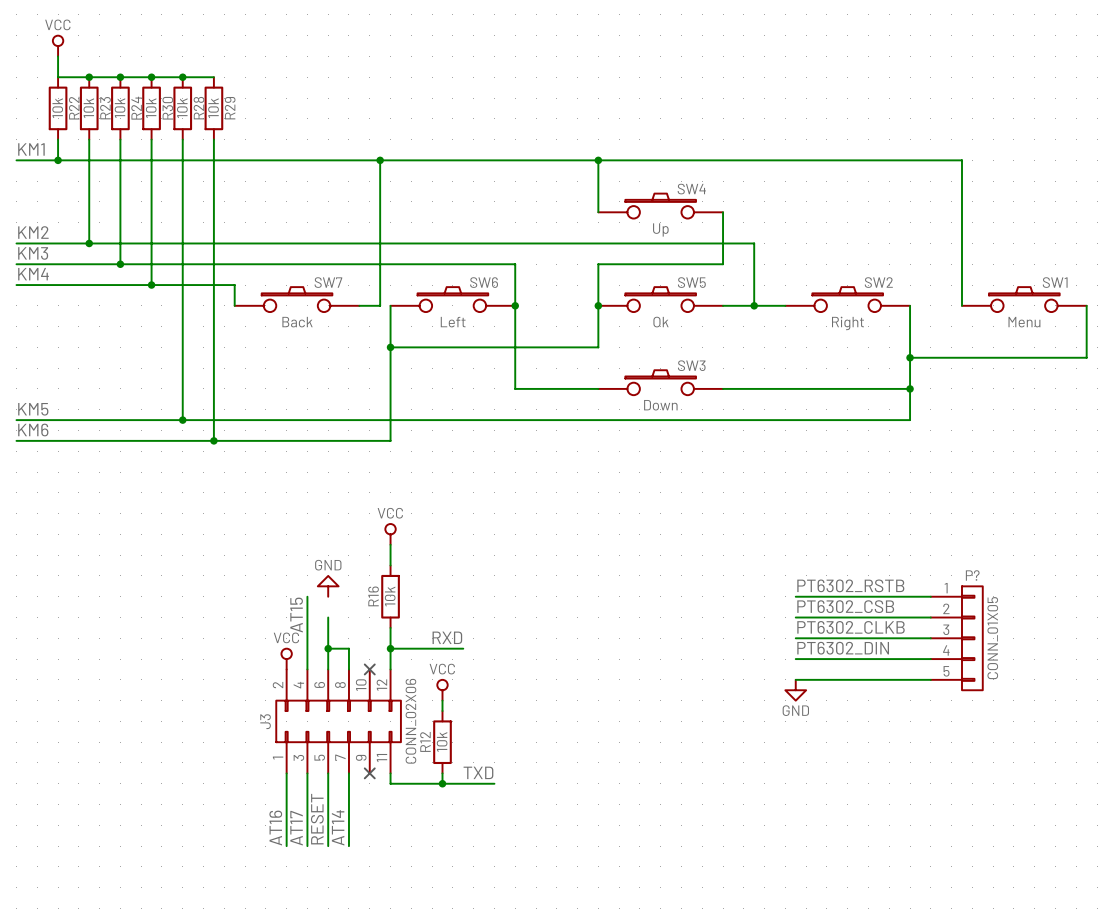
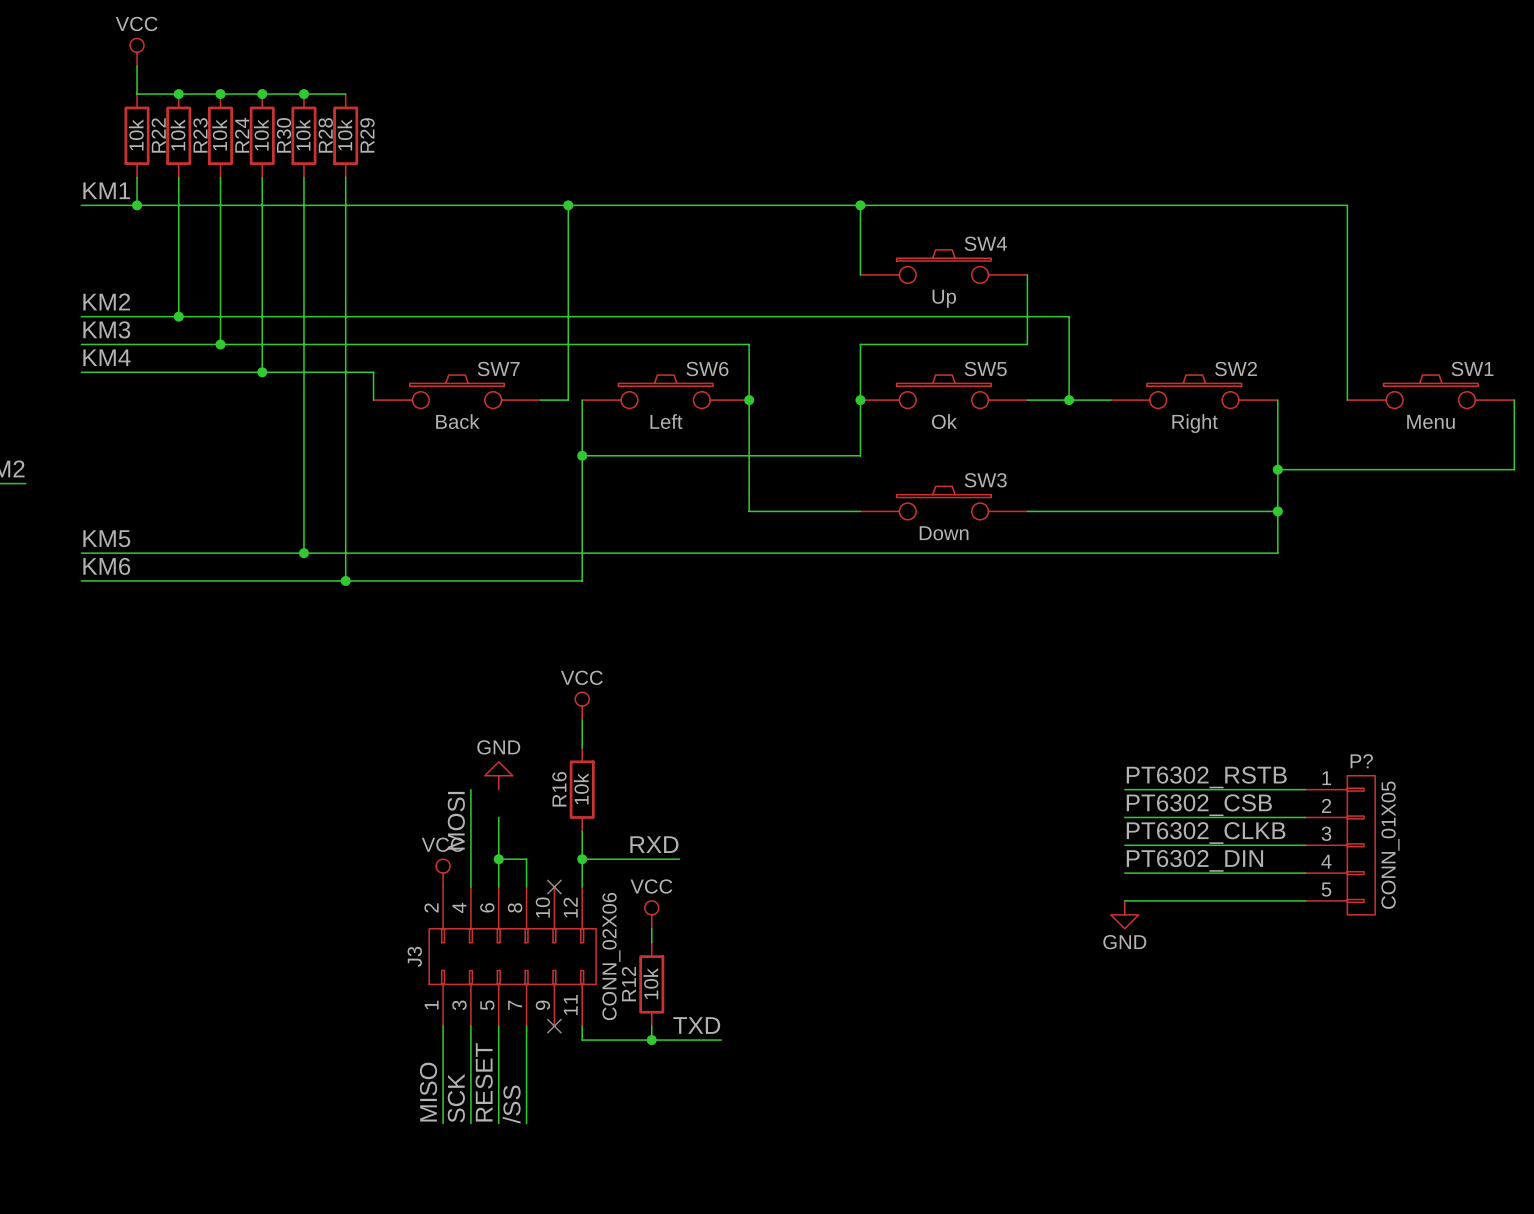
label: AT15 (296, 615) -> MOSI (456, 820)
label: AT14 (338, 827) -> /SS (511, 1104)
label: AT16 (275, 828) -> MISO (428, 1092)
label: AT17 (296, 828) -> SCK (456, 1098)

